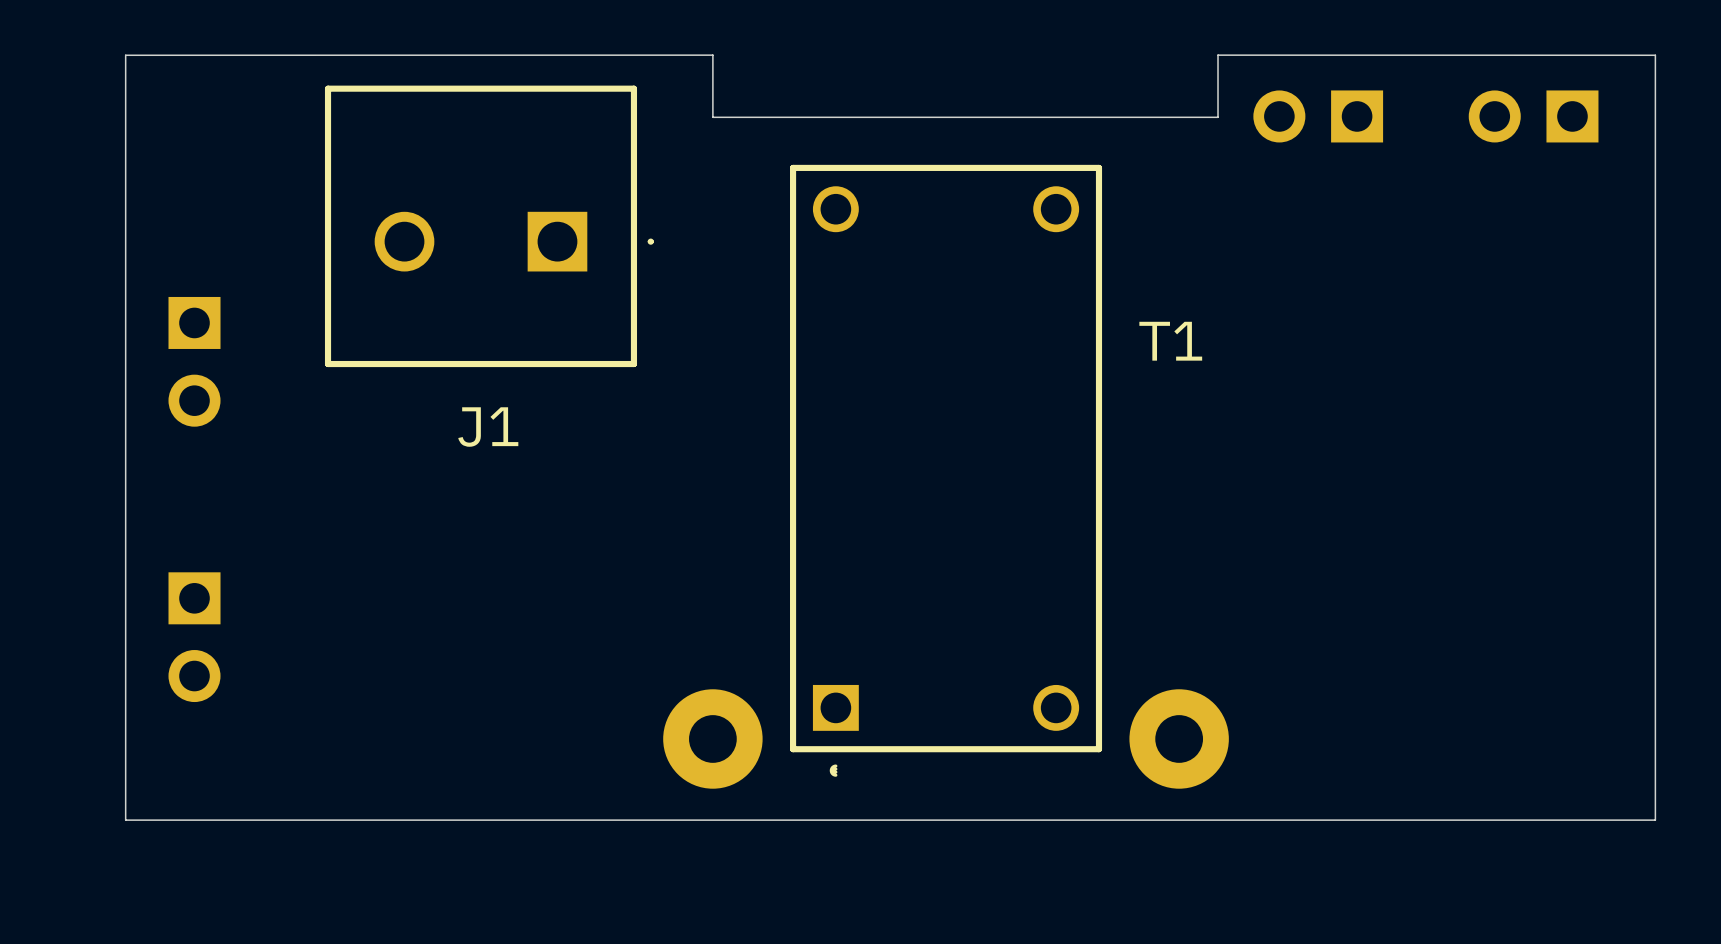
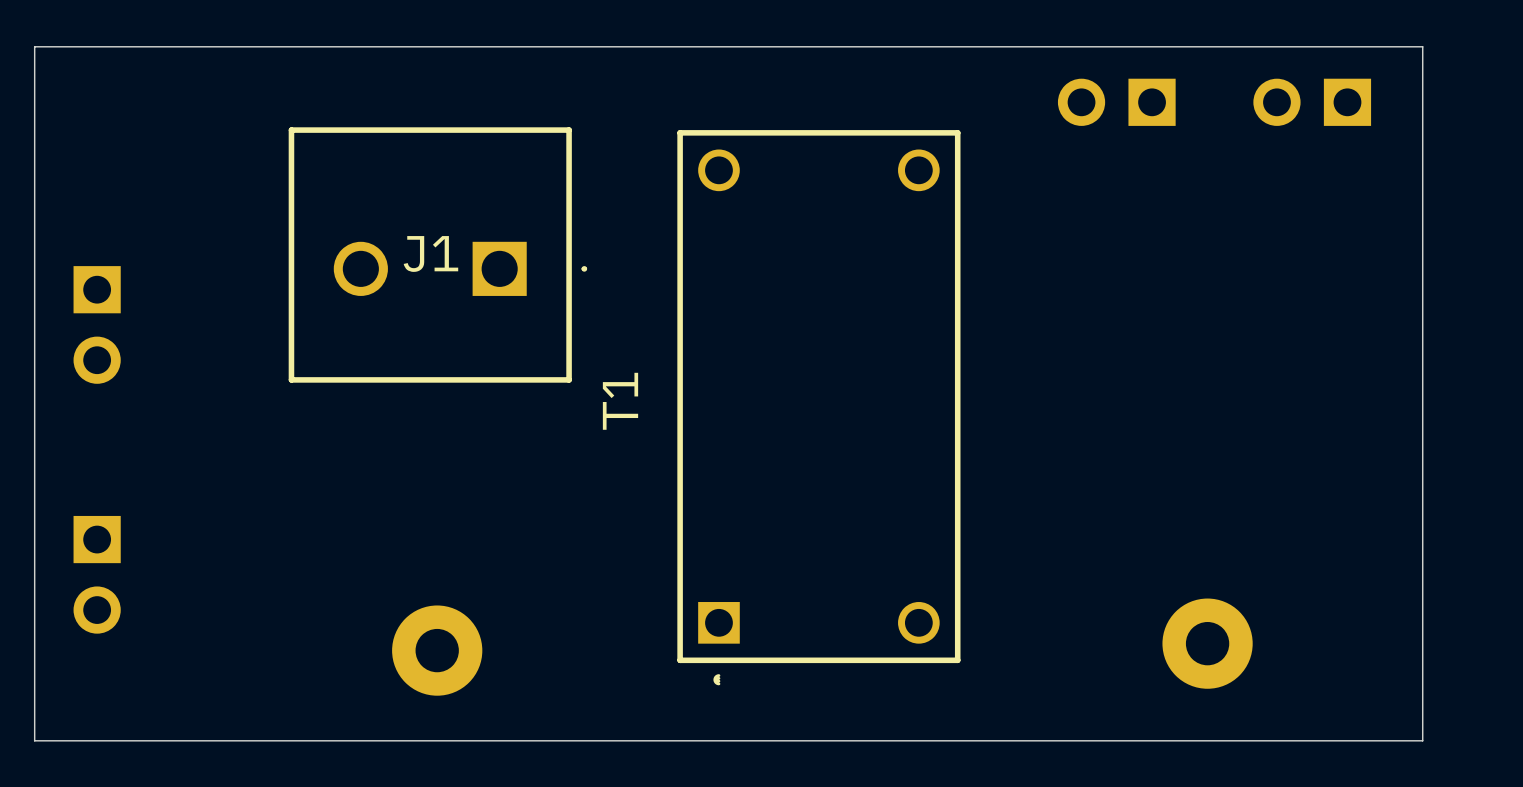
board edge: (125, 55) (712, 55) (712, 117) (1218, 117) (1218, 55) (1655, 55) -> (34, 46) (1422, 46)
J1 position: (489, 226) -> (437, 255)
T1 name rotation: 0° (1170, 341) -> 90° counterclockwise (620, 401)
T1 name position: T1 (1170, 341) -> T1 (620, 401)
J1 name position: J1 (488, 427) -> J1 (430, 253)
T1 position: (946, 470) -> (818, 407)
part position: (712, 738) -> (437, 650)
part position: (1179, 738) -> (1207, 643)

